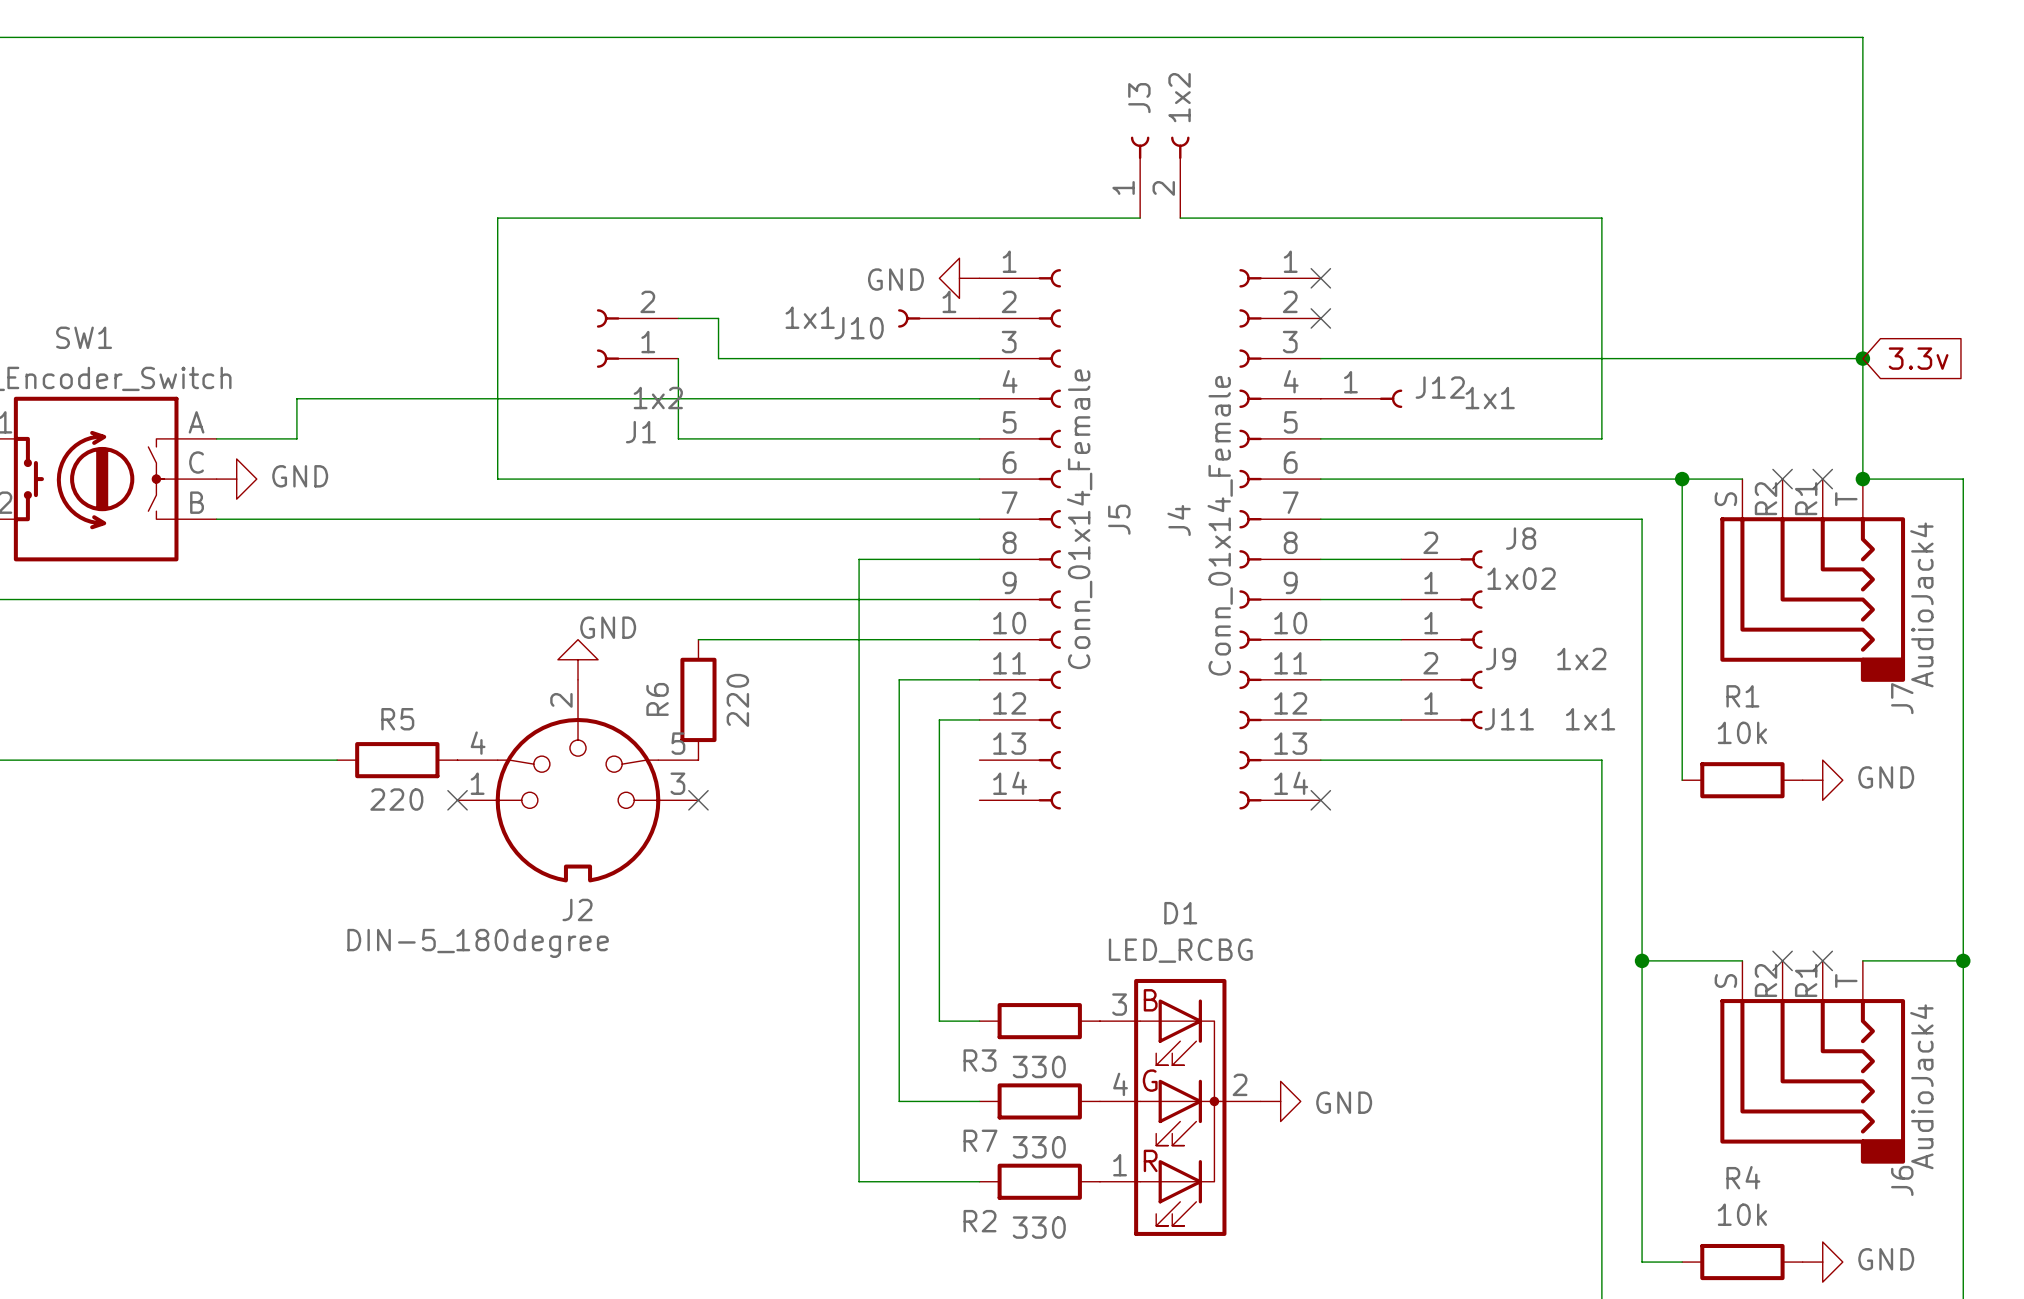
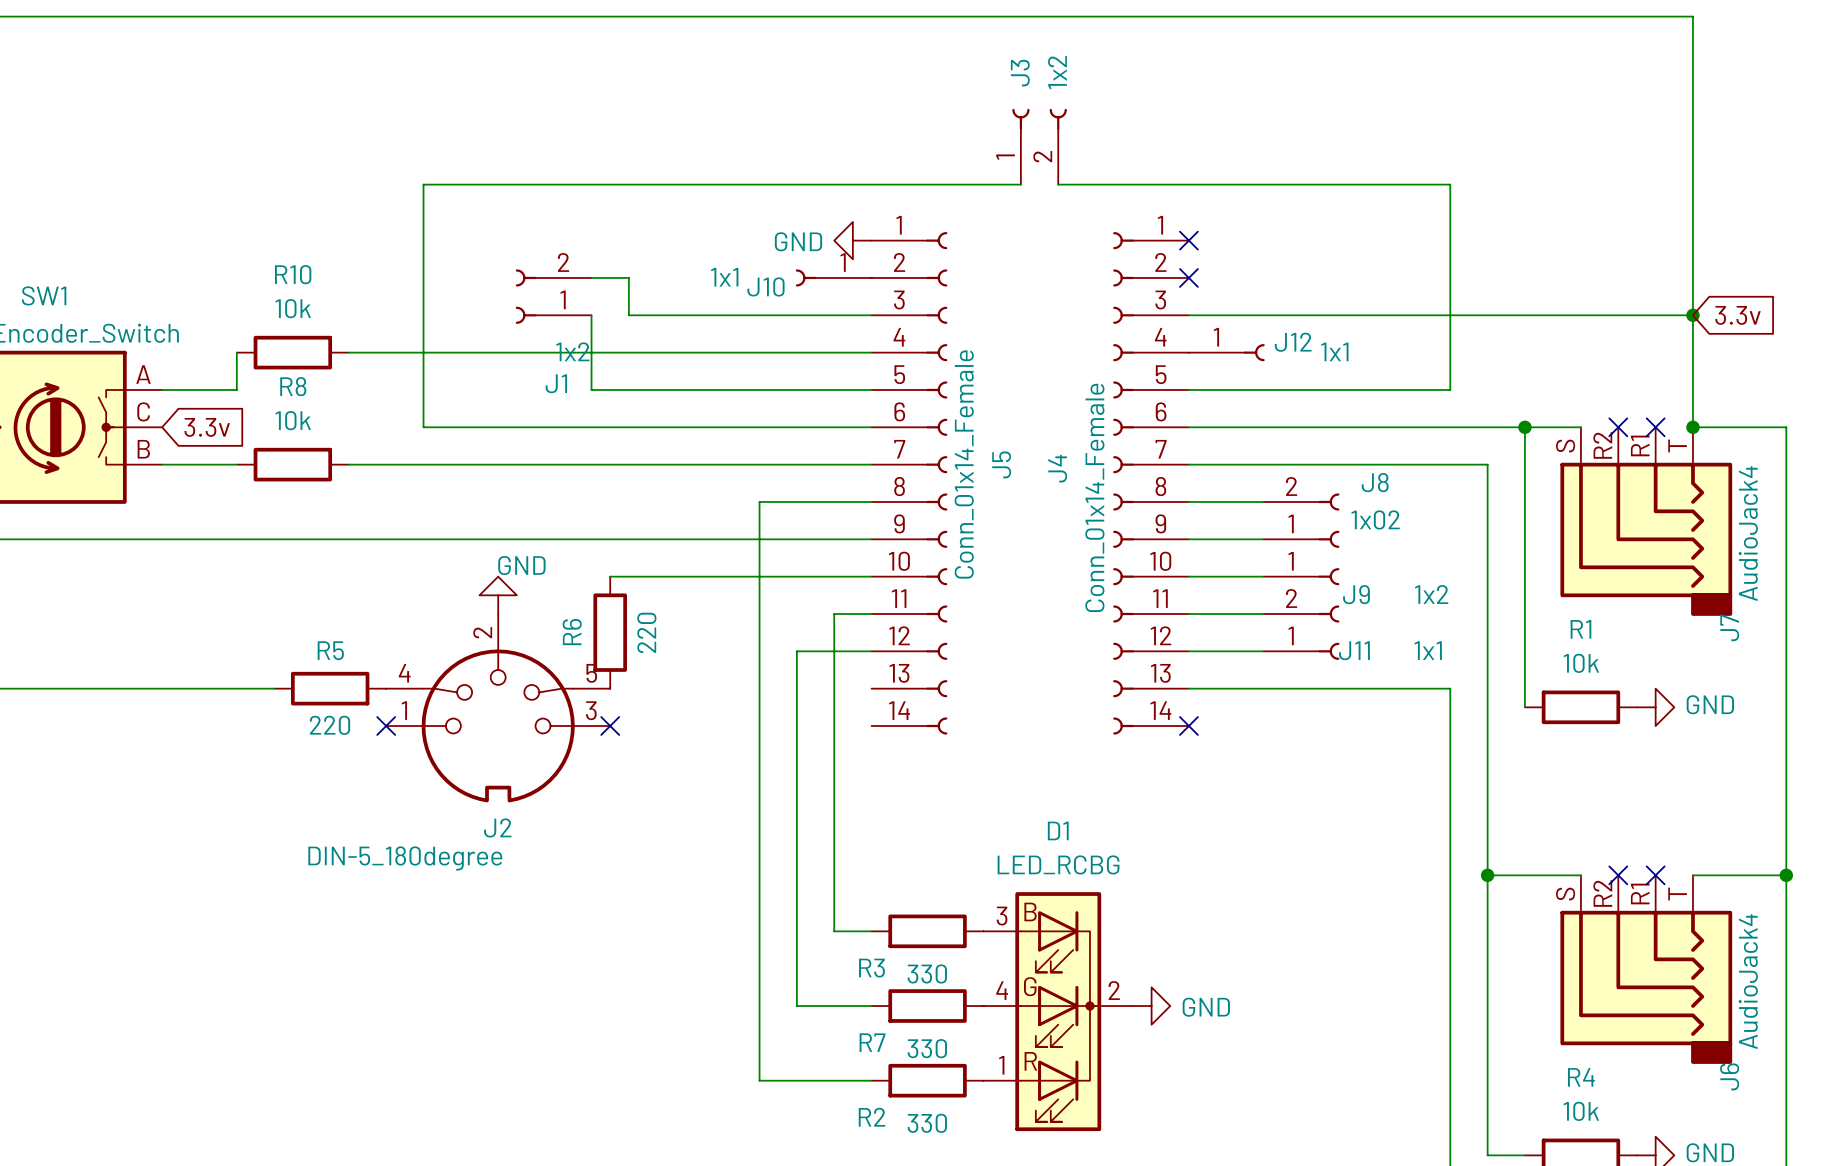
wire: (296, 398) (417, 398) -> none
R10: none -> 10k (292, 352)
power symbol: GND (236, 479) -> none
global label: none -> 3.3v (207, 427)
wire: (296, 519) (417, 519) -> none
R8: none -> 10k (292, 464)
wire: (939, 679) (899, 679) (899, 719) -> (834, 613) (834, 651) (796, 651)

